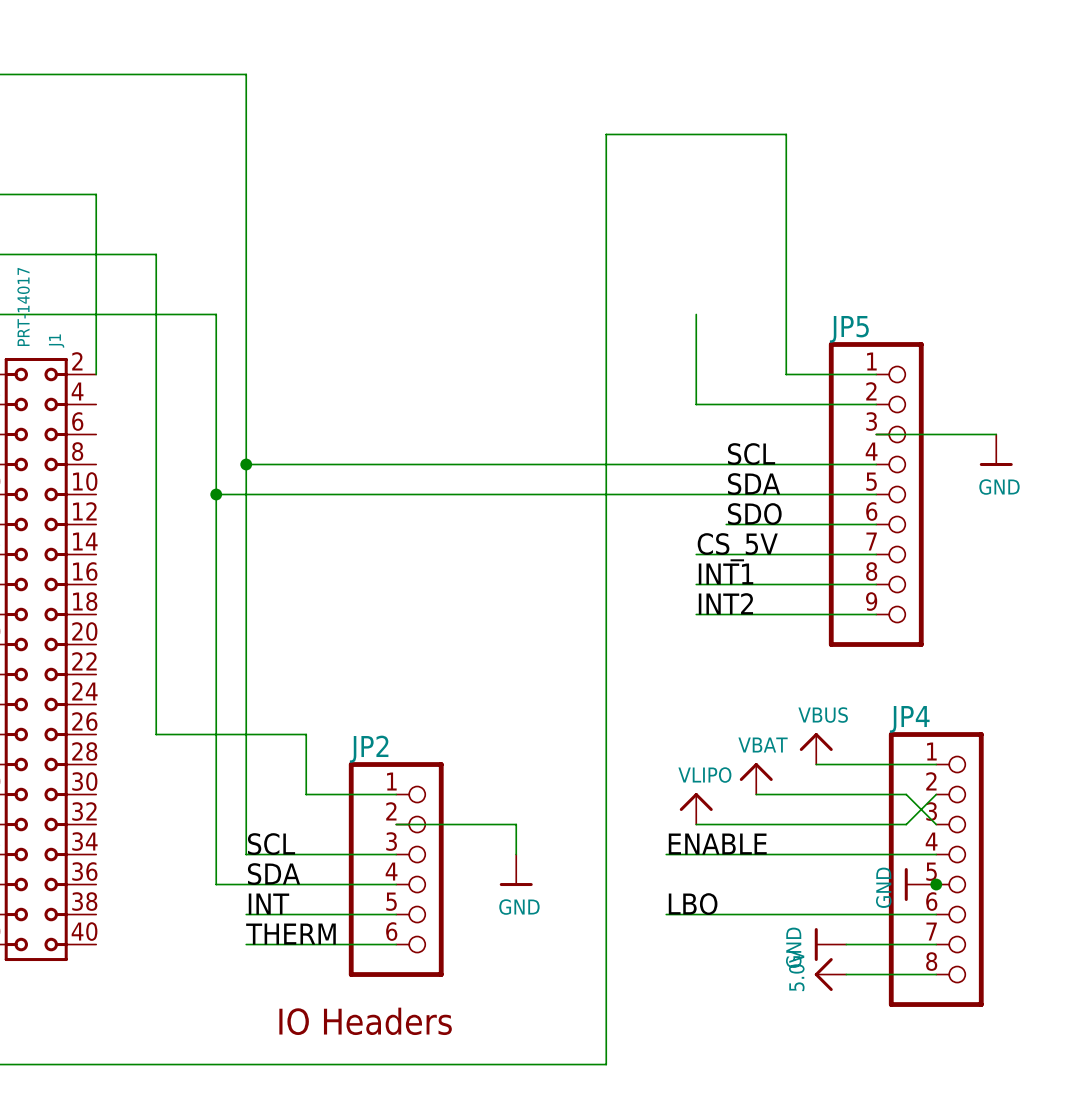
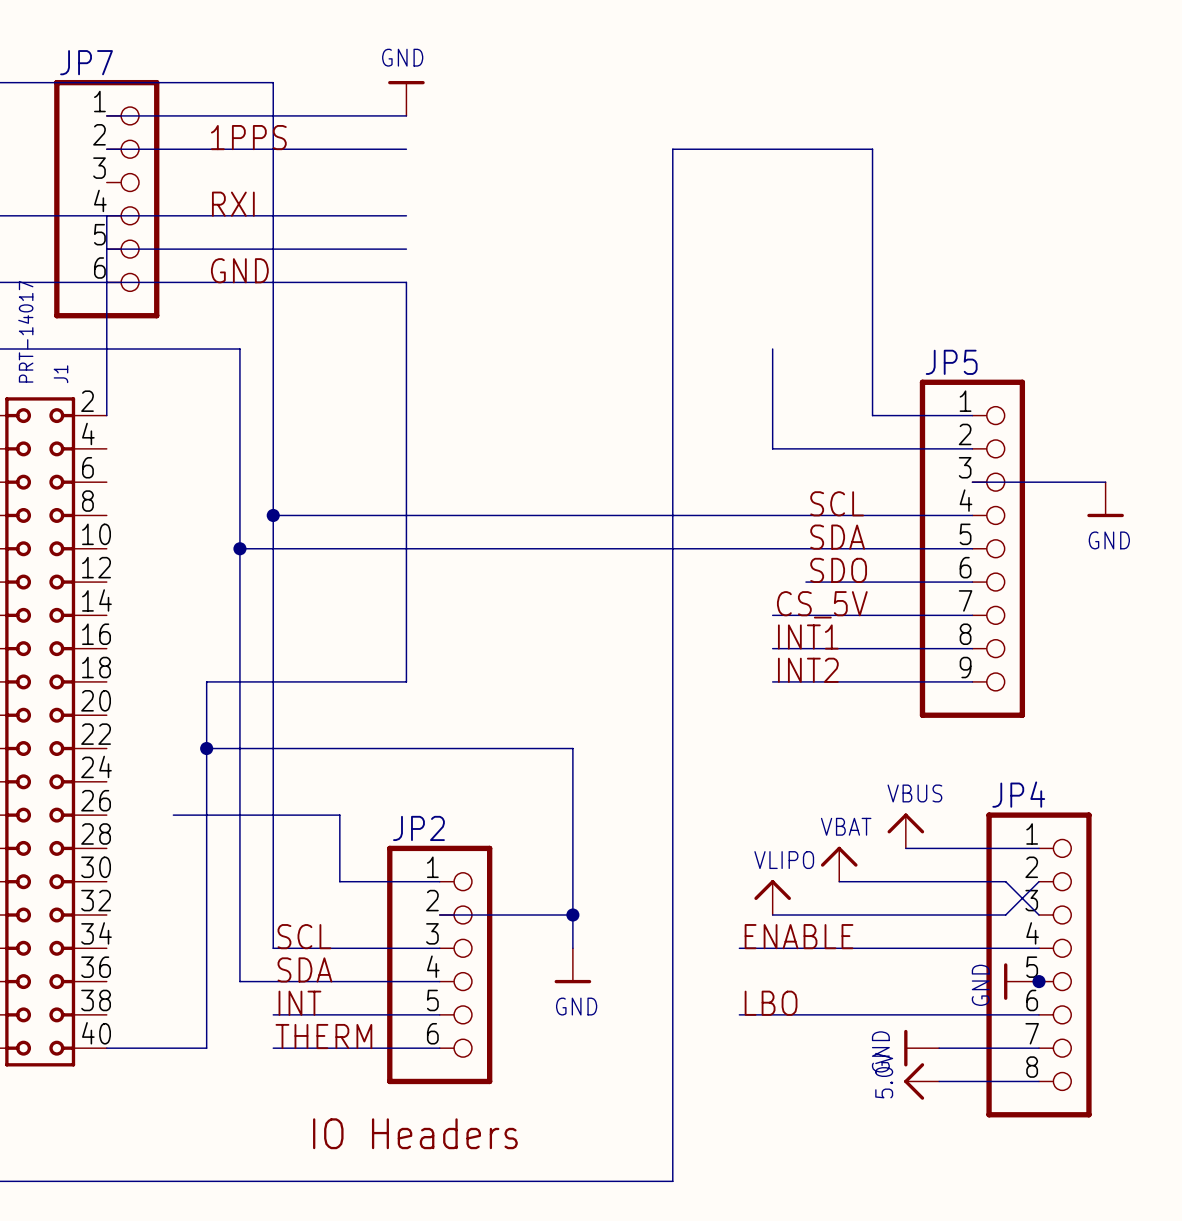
power symbol: none -> GND (406, 98)
wire: none -> (106, 115) (406, 115)
label: none -> 1PPS (248, 137)
wire: none -> (106, 149) (406, 149)
JP7: none -> (106, 199)
label: none -> RXI (233, 204)
wire: none -> (106, 215) (406, 215)
wire: none -> (106, 249) (406, 249)
label: none -> GND (239, 270)
wire: (156, 254) (156, 734) -> (173, 282) (406, 282) (406, 681) (206, 681) (206, 1048) (106, 1048)
wire: none -> (206, 748) (572, 748) (572, 915)
junction: none -> (206, 748)
junction: none -> (572, 915)

